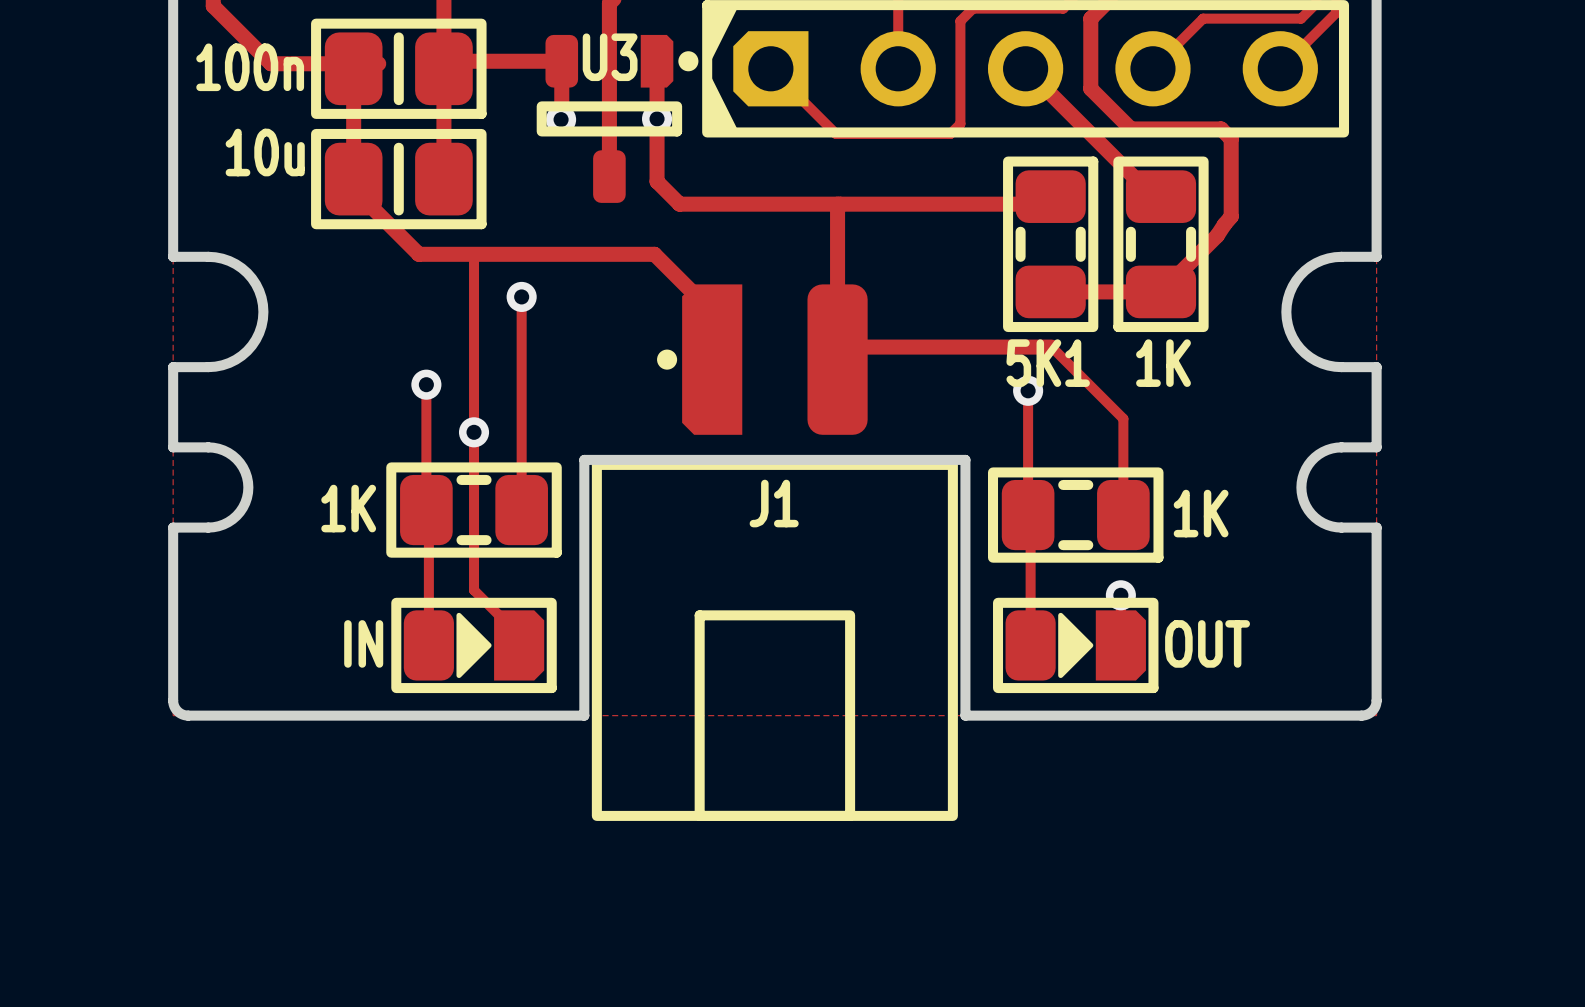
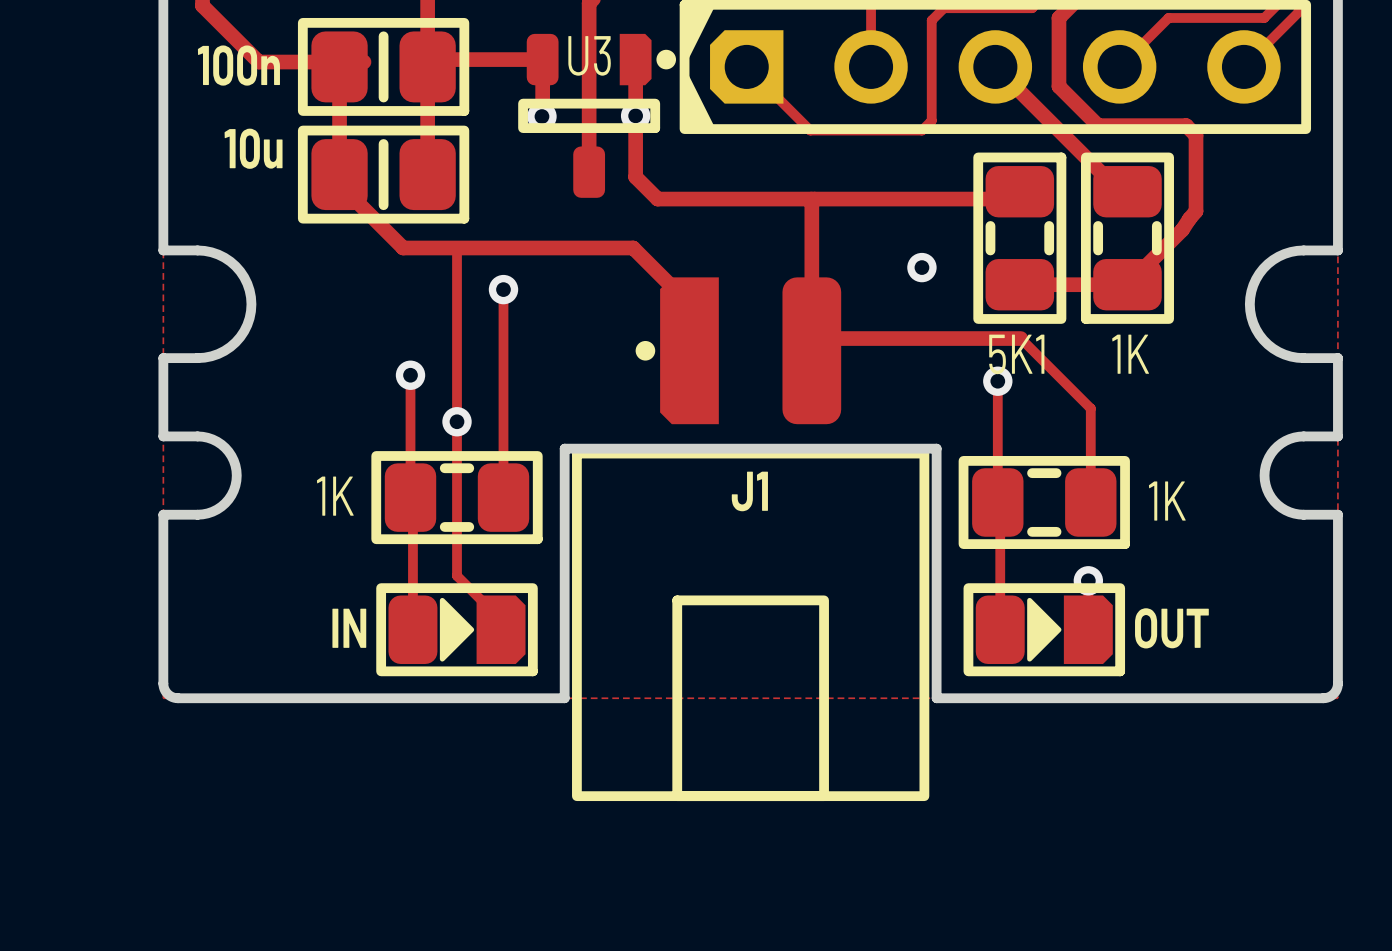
via: none -> (921, 267)

